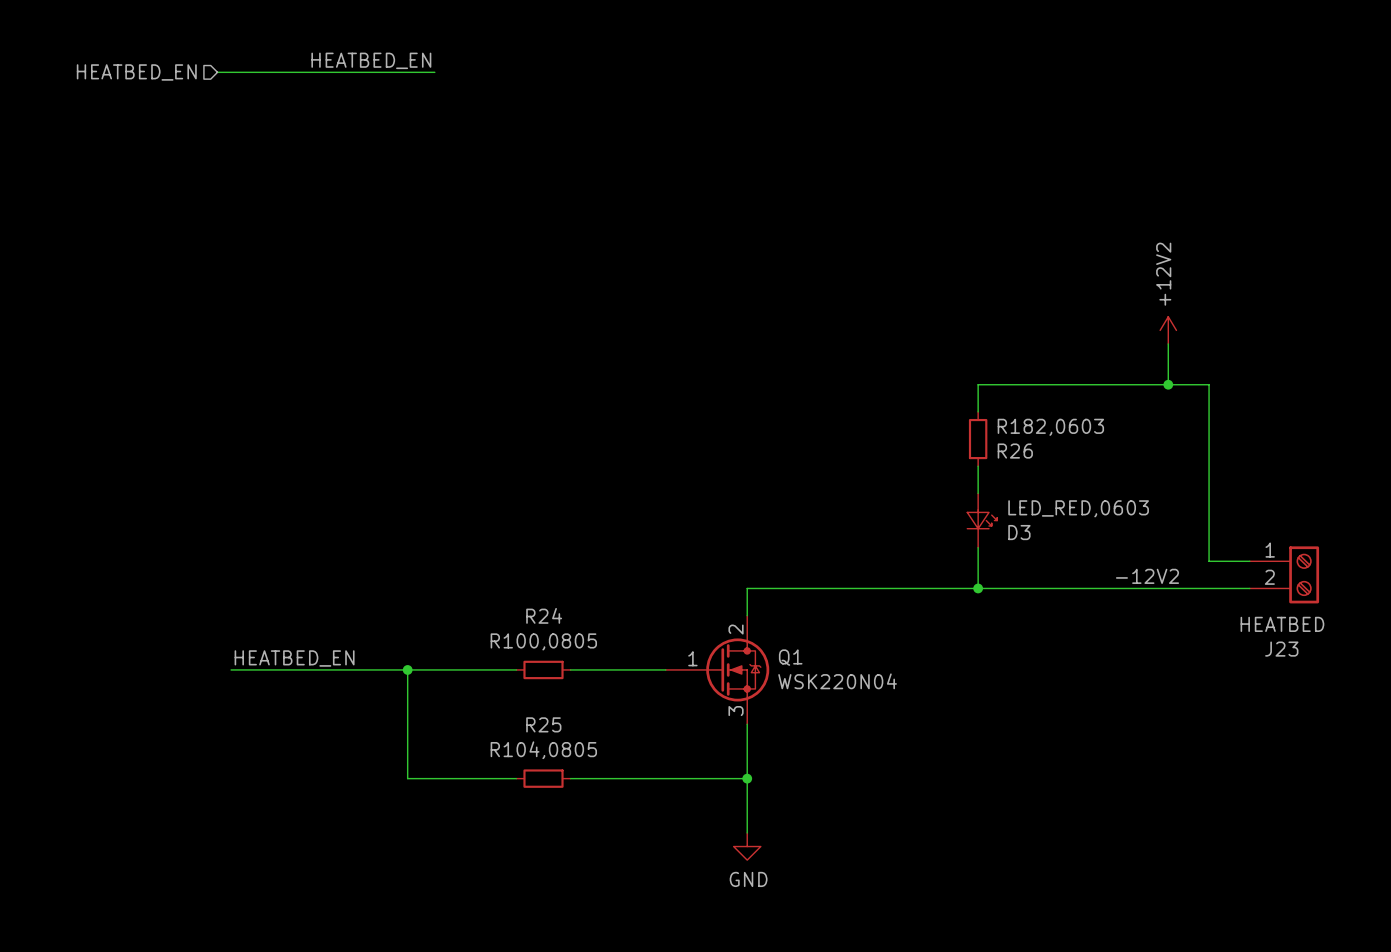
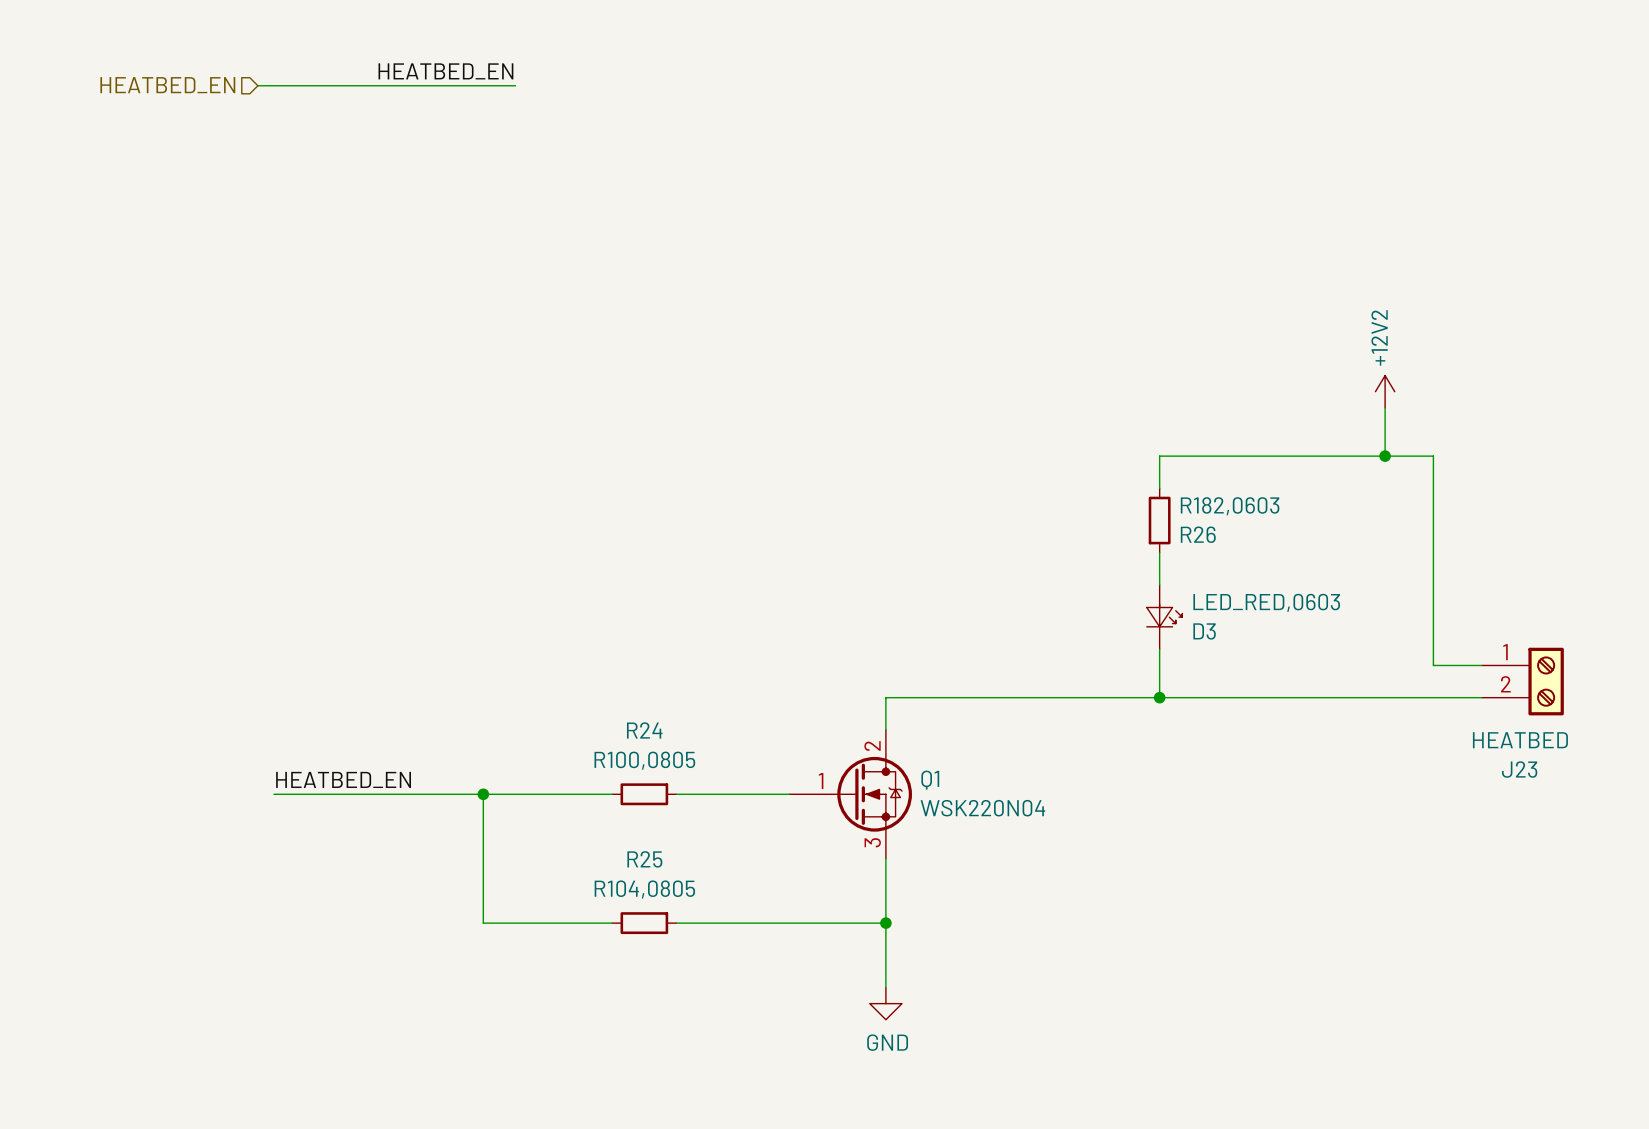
label: -12V2 (1147, 576) -> none

